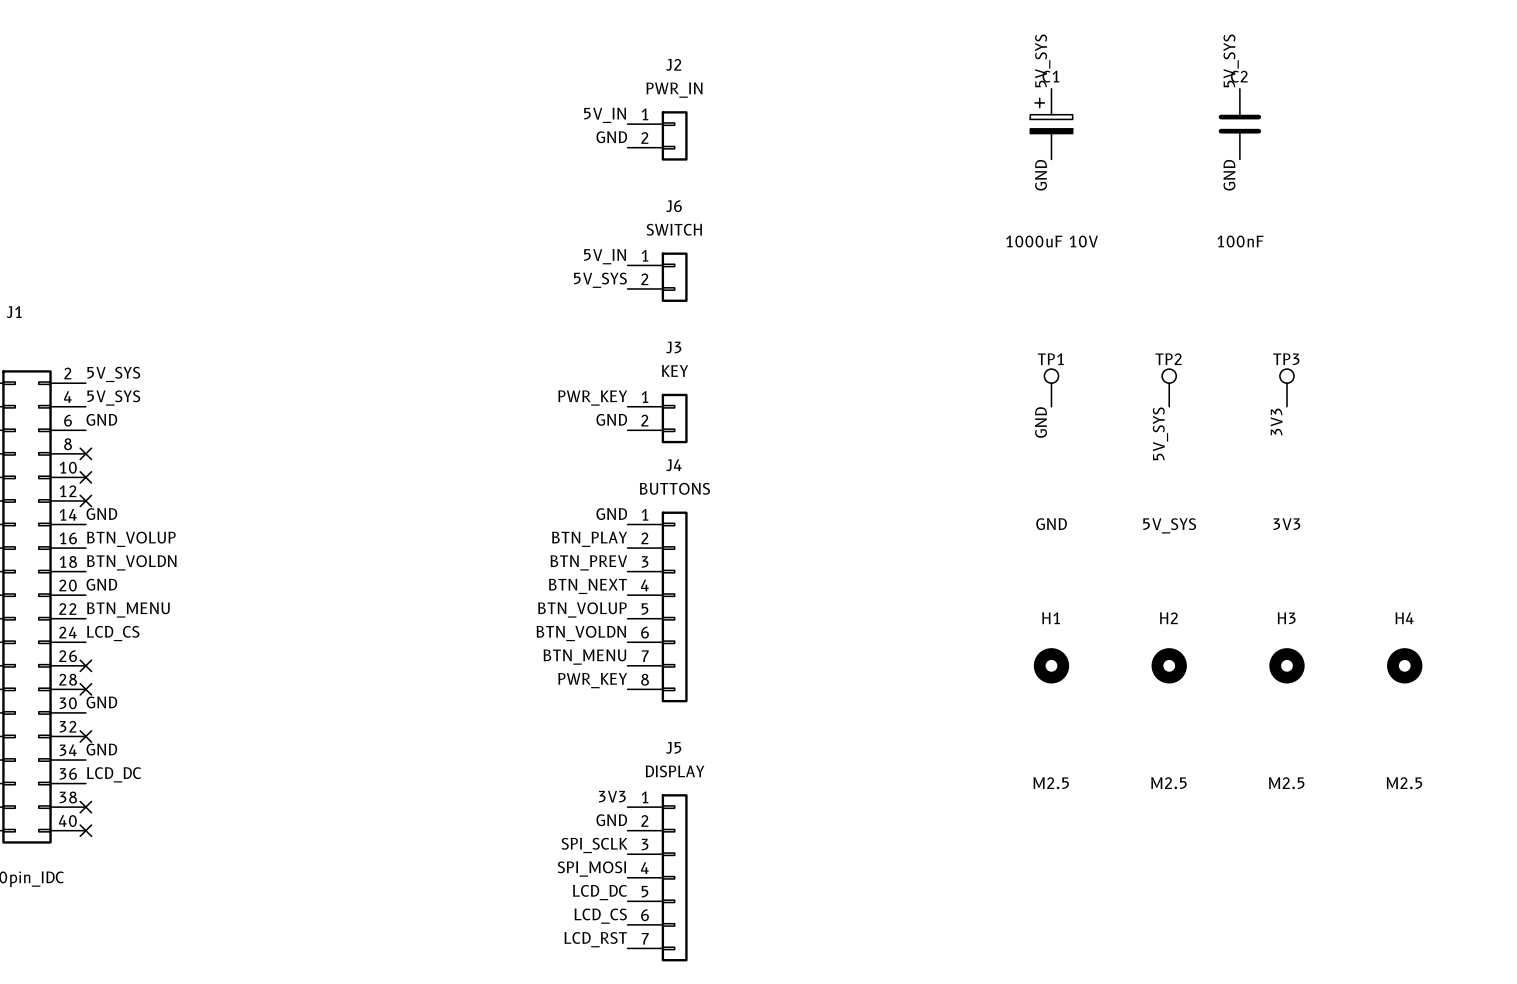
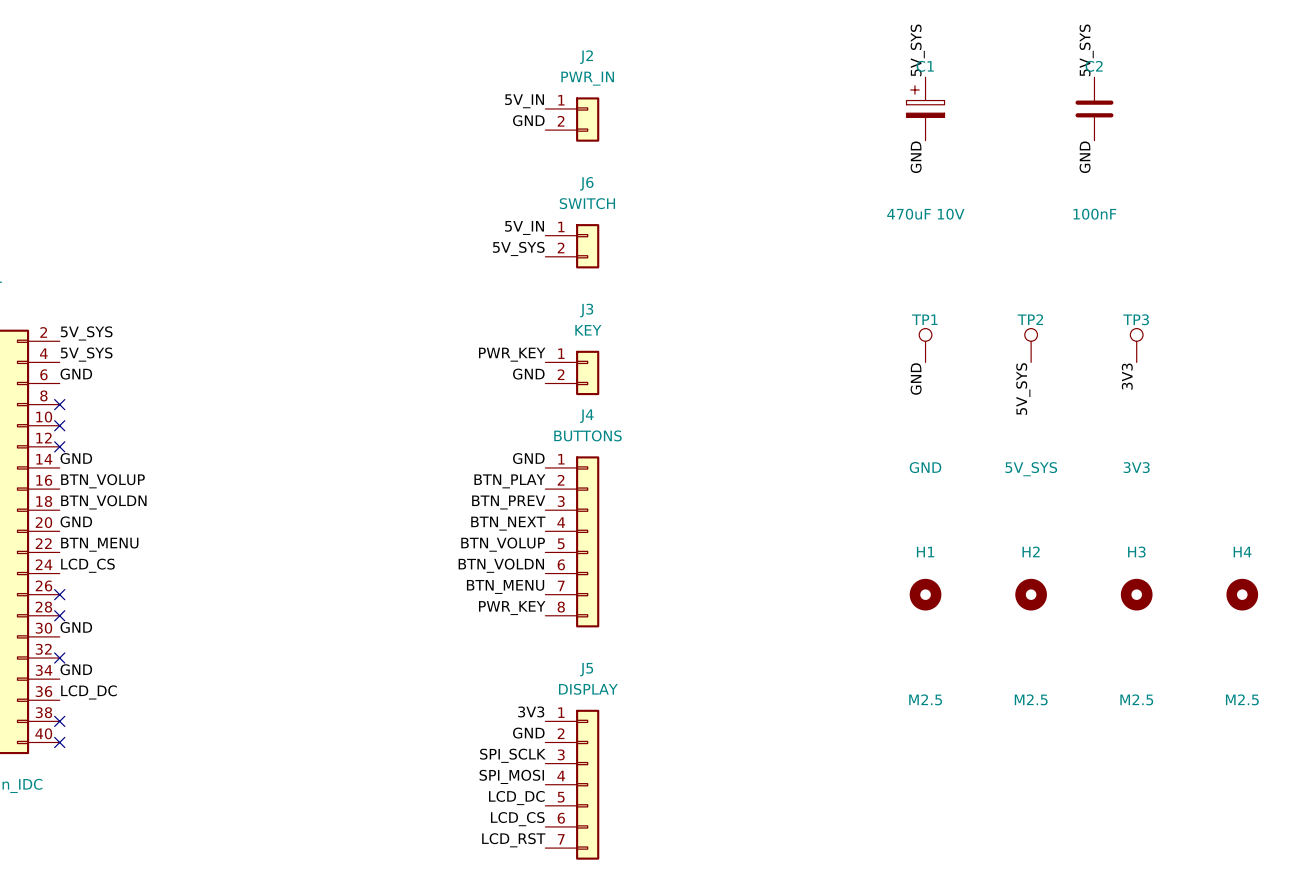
C1 value: 1000uF 10V (1052, 241) -> 470uF 10V (925, 214)

